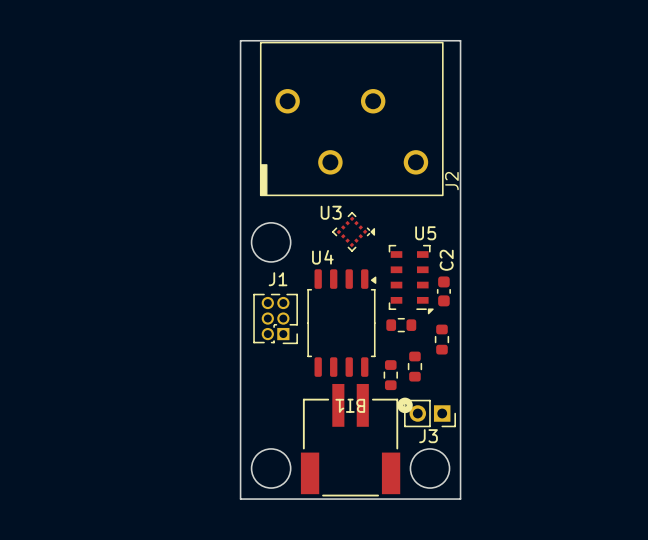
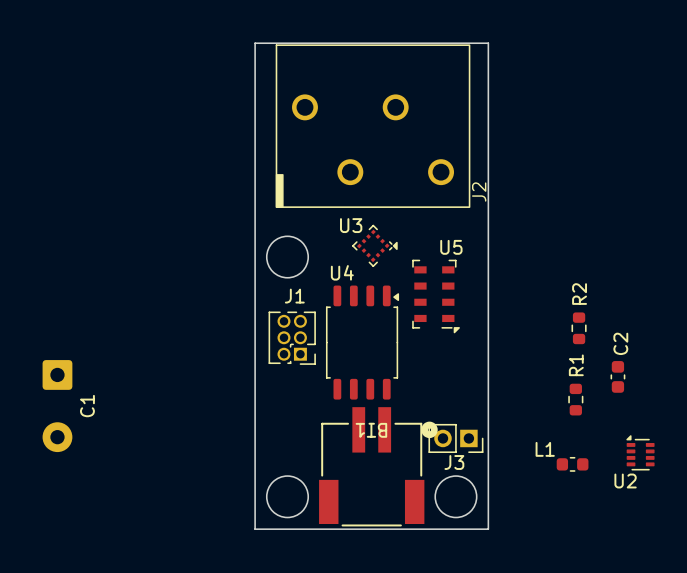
C2 position: (443, 291) -> (617, 376)
R2: none -> (579, 328)
part: (401, 325) -> none
part: (441, 339) -> none
part: (414, 366) -> none
part: (390, 375) -> none
R1: none -> (575, 399)
C1: none -> (57, 406)
U2: none -> (640, 452)
L1: none -> (572, 464)

